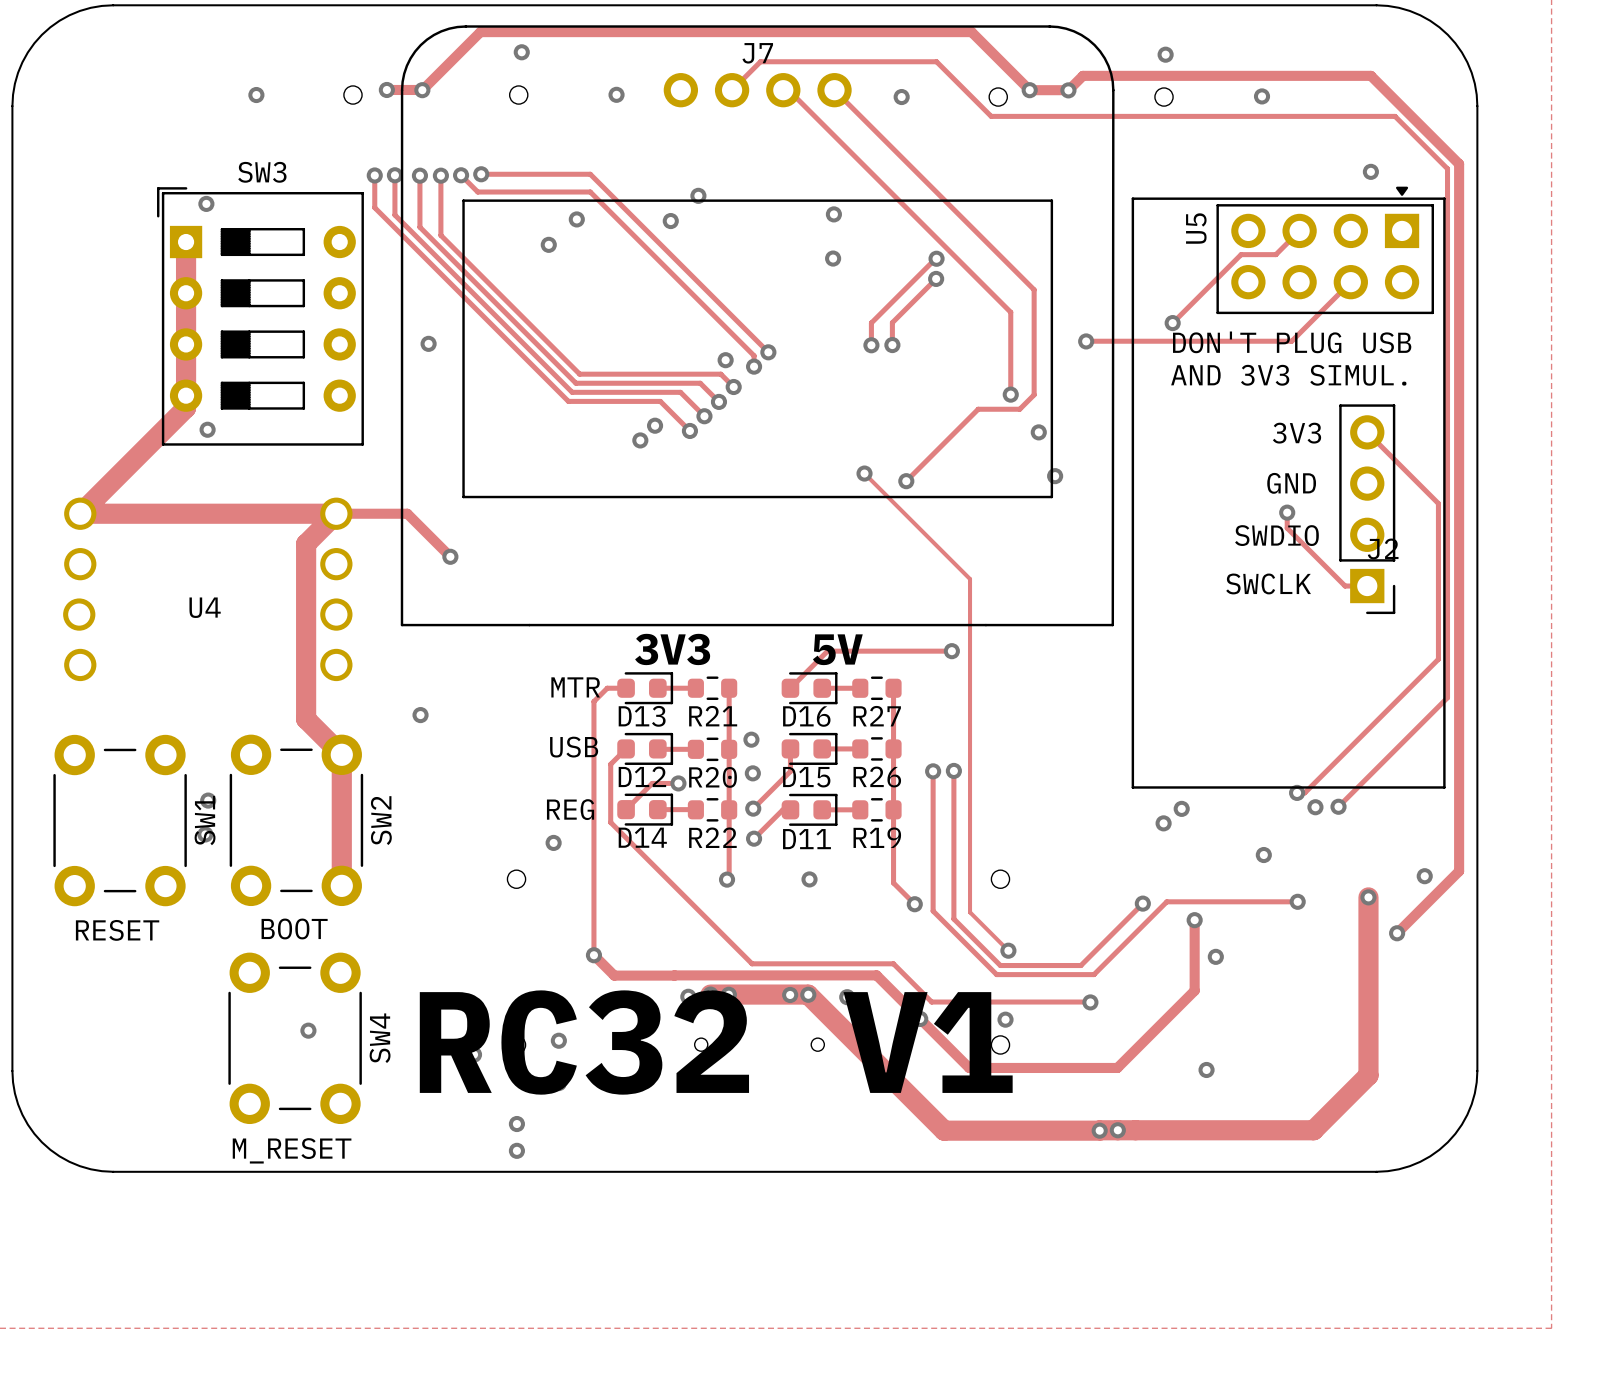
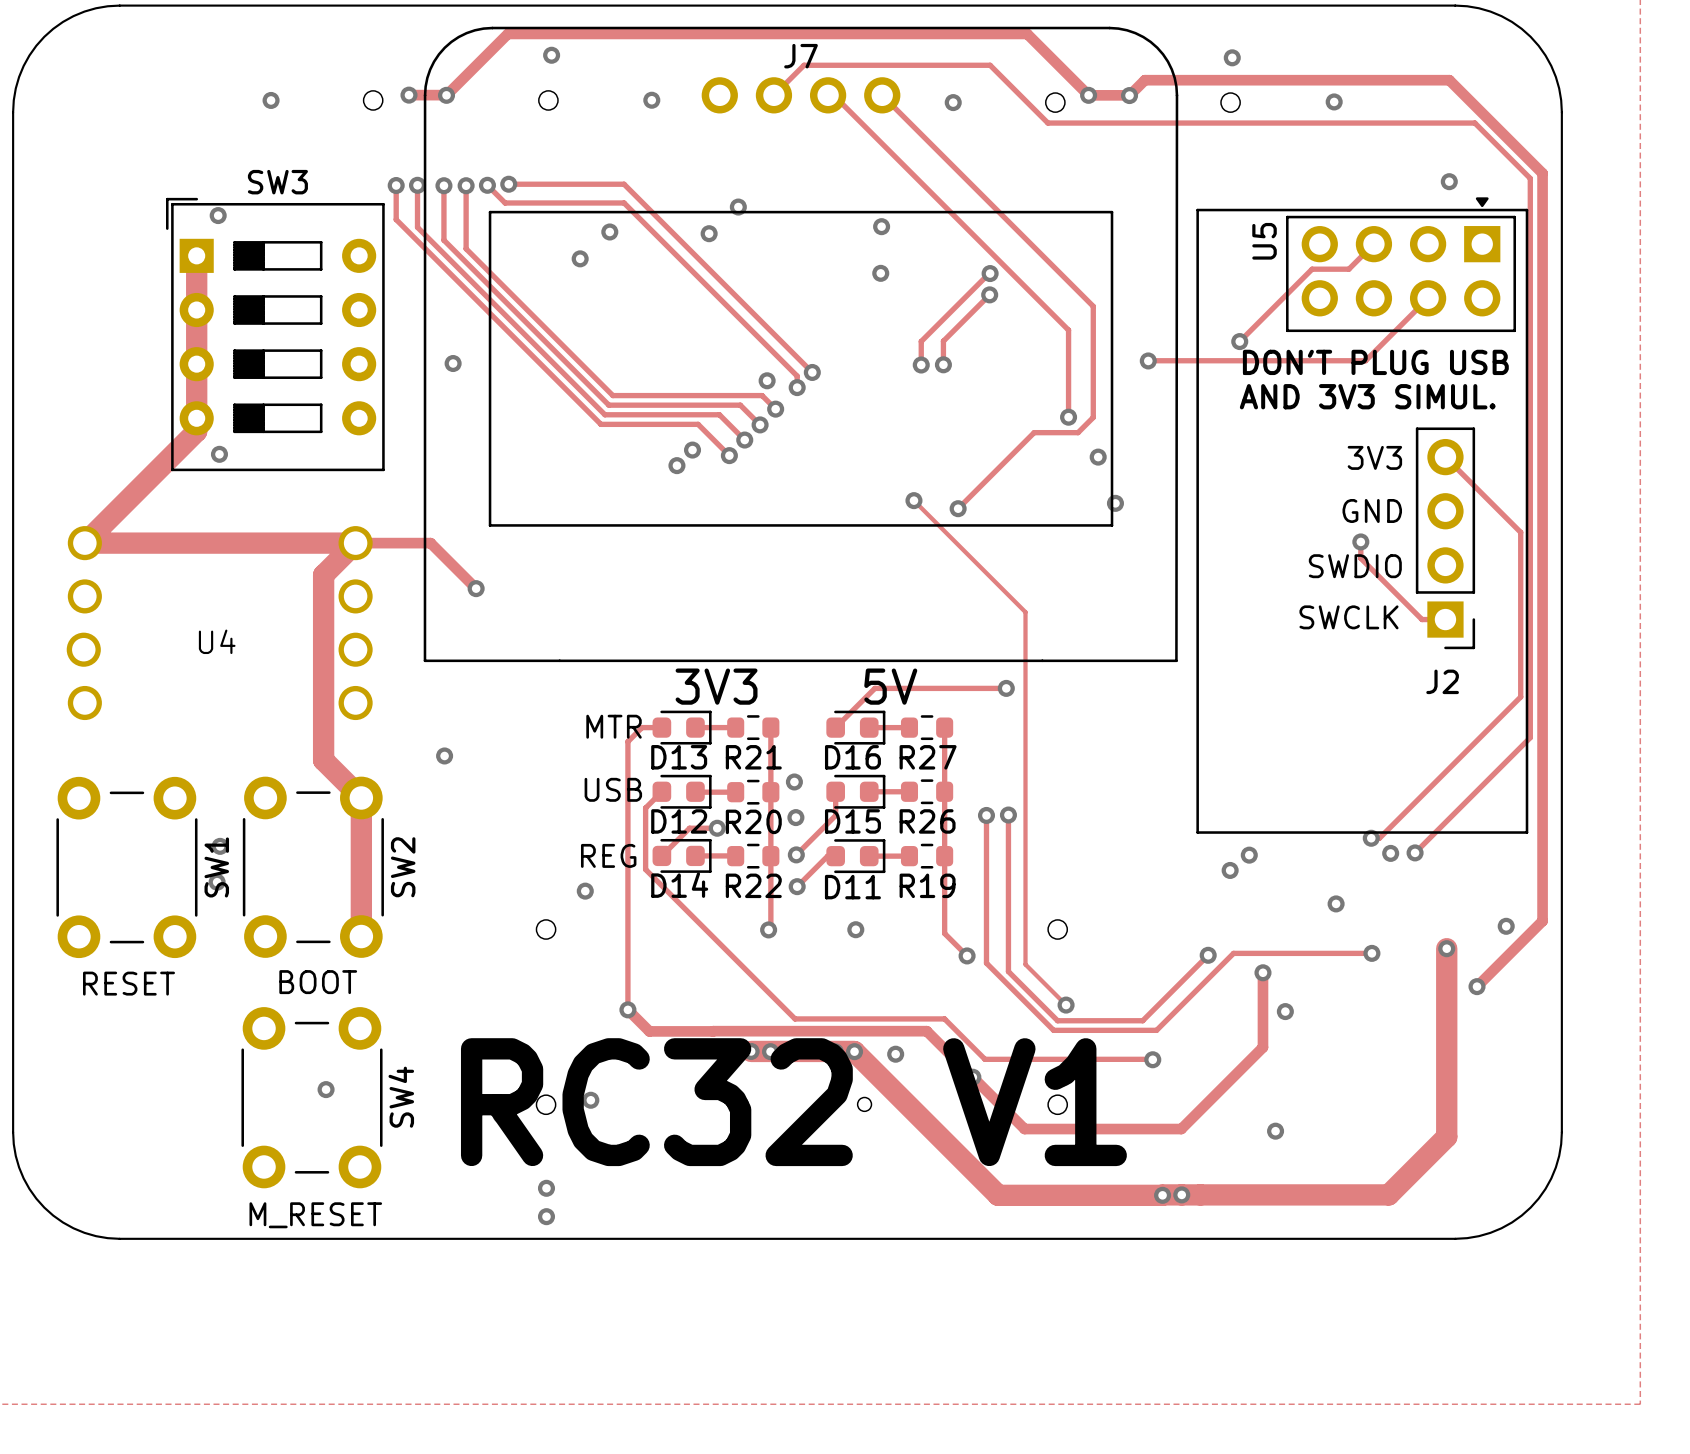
J2 name position: J2 (1383, 548) -> J2 (1442, 681)

